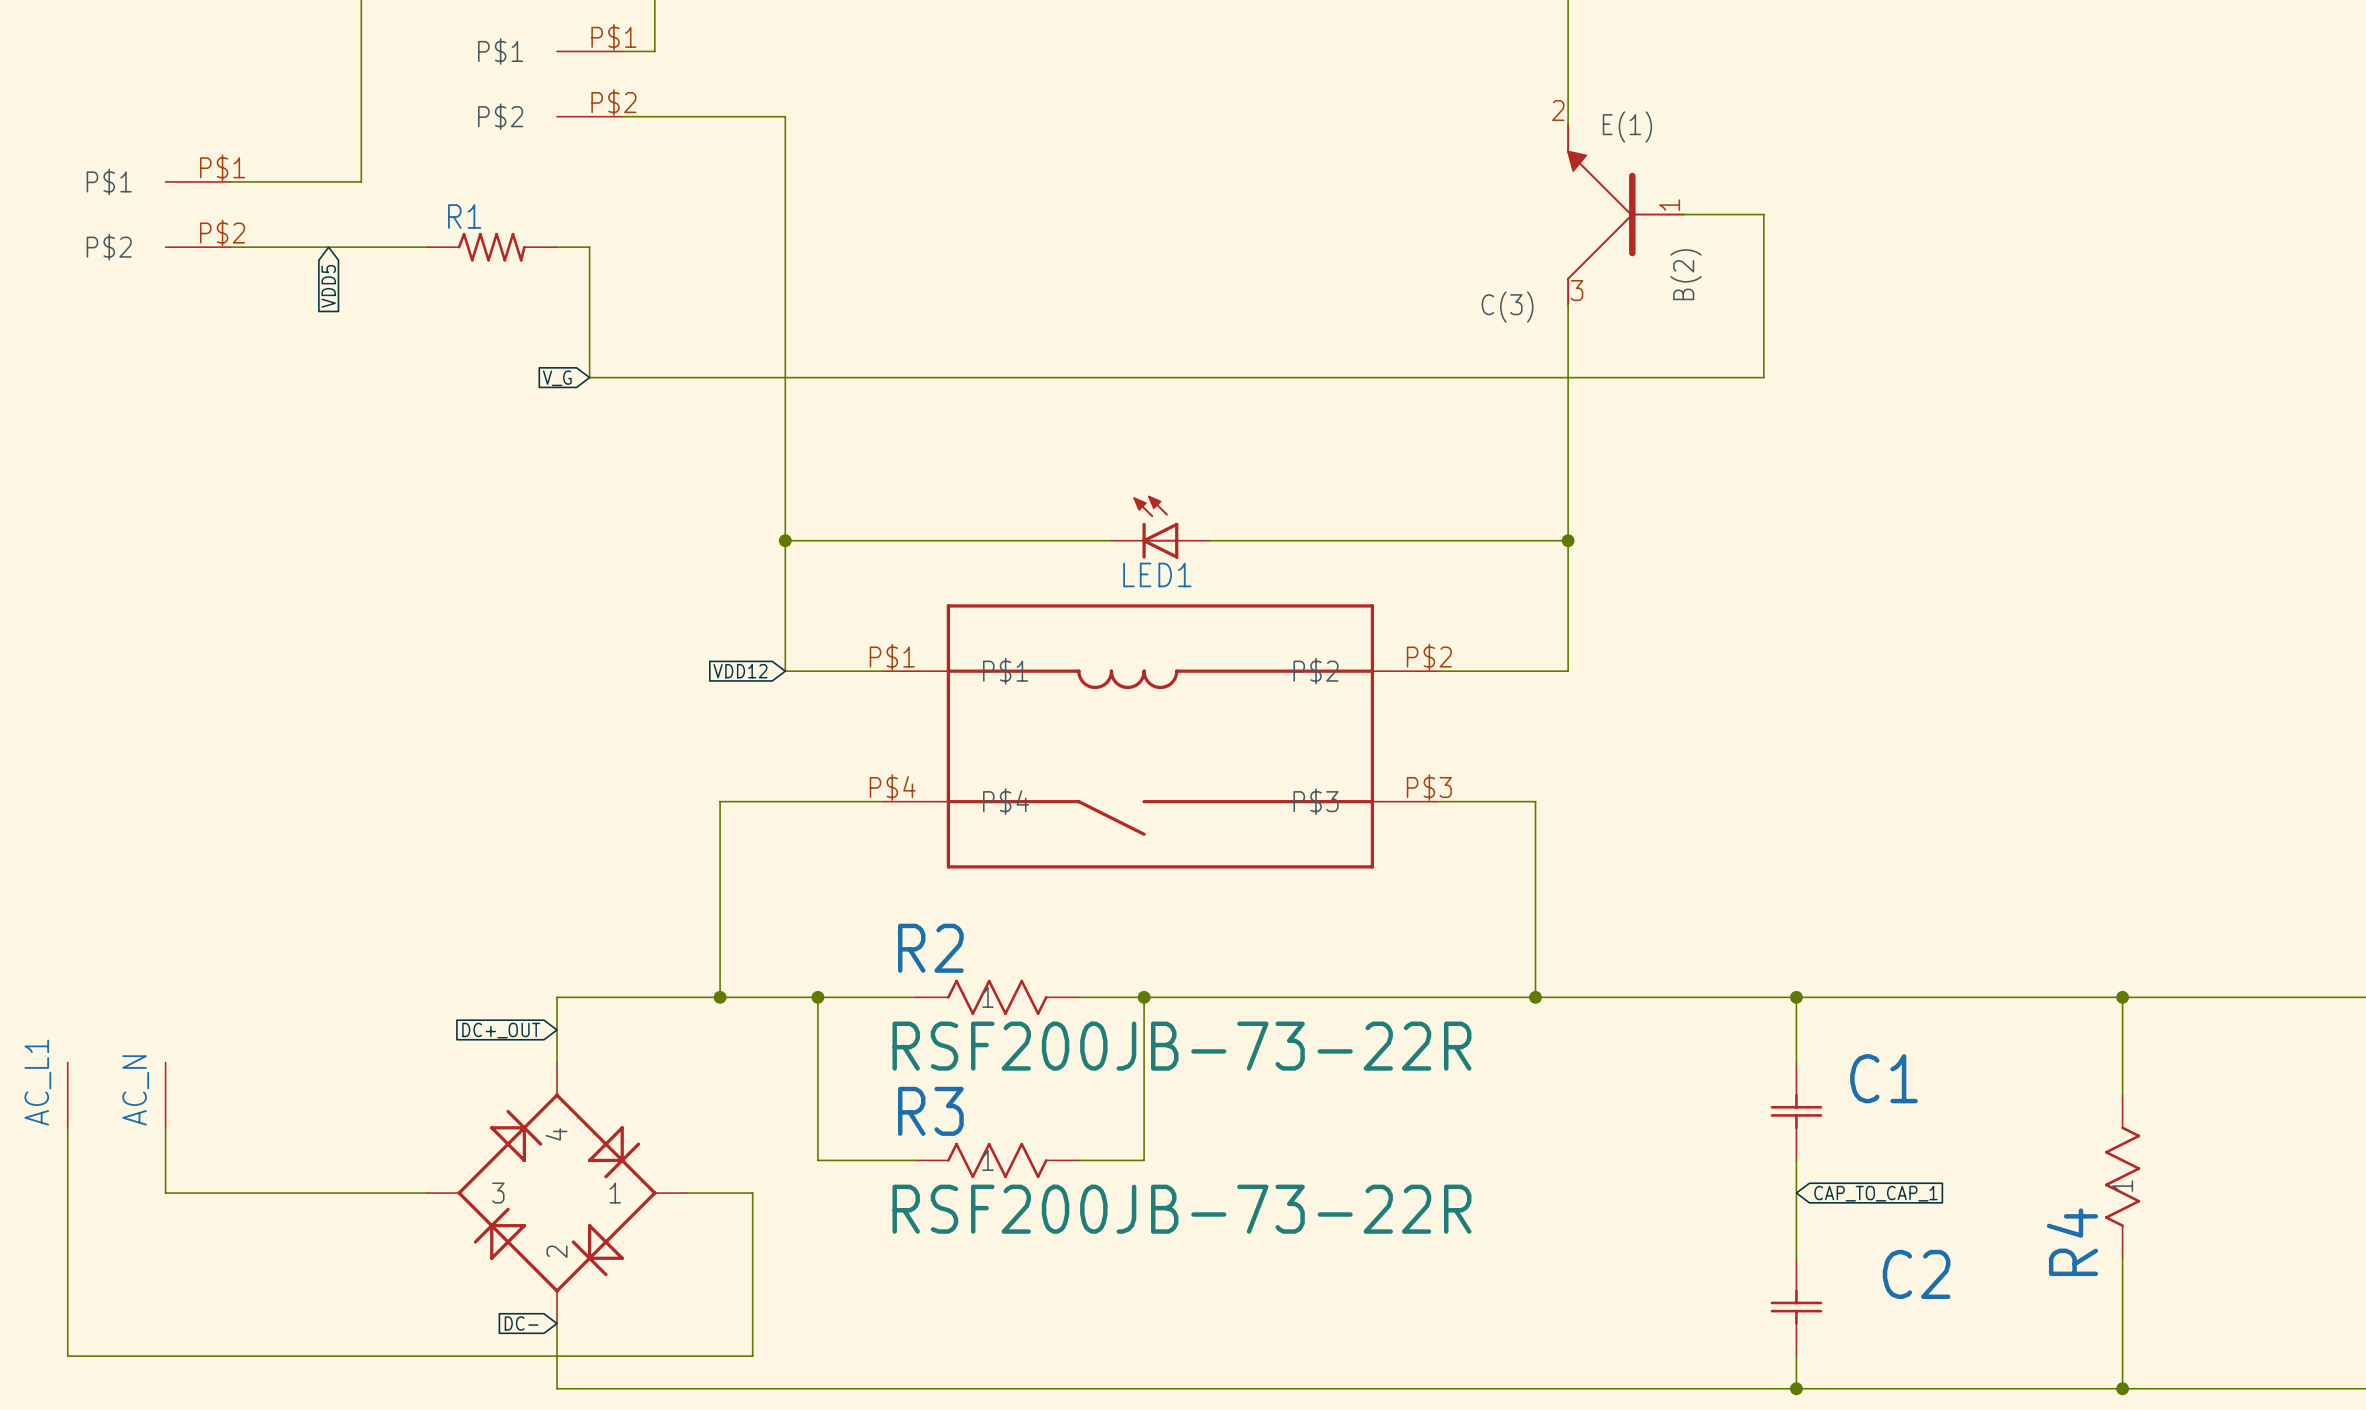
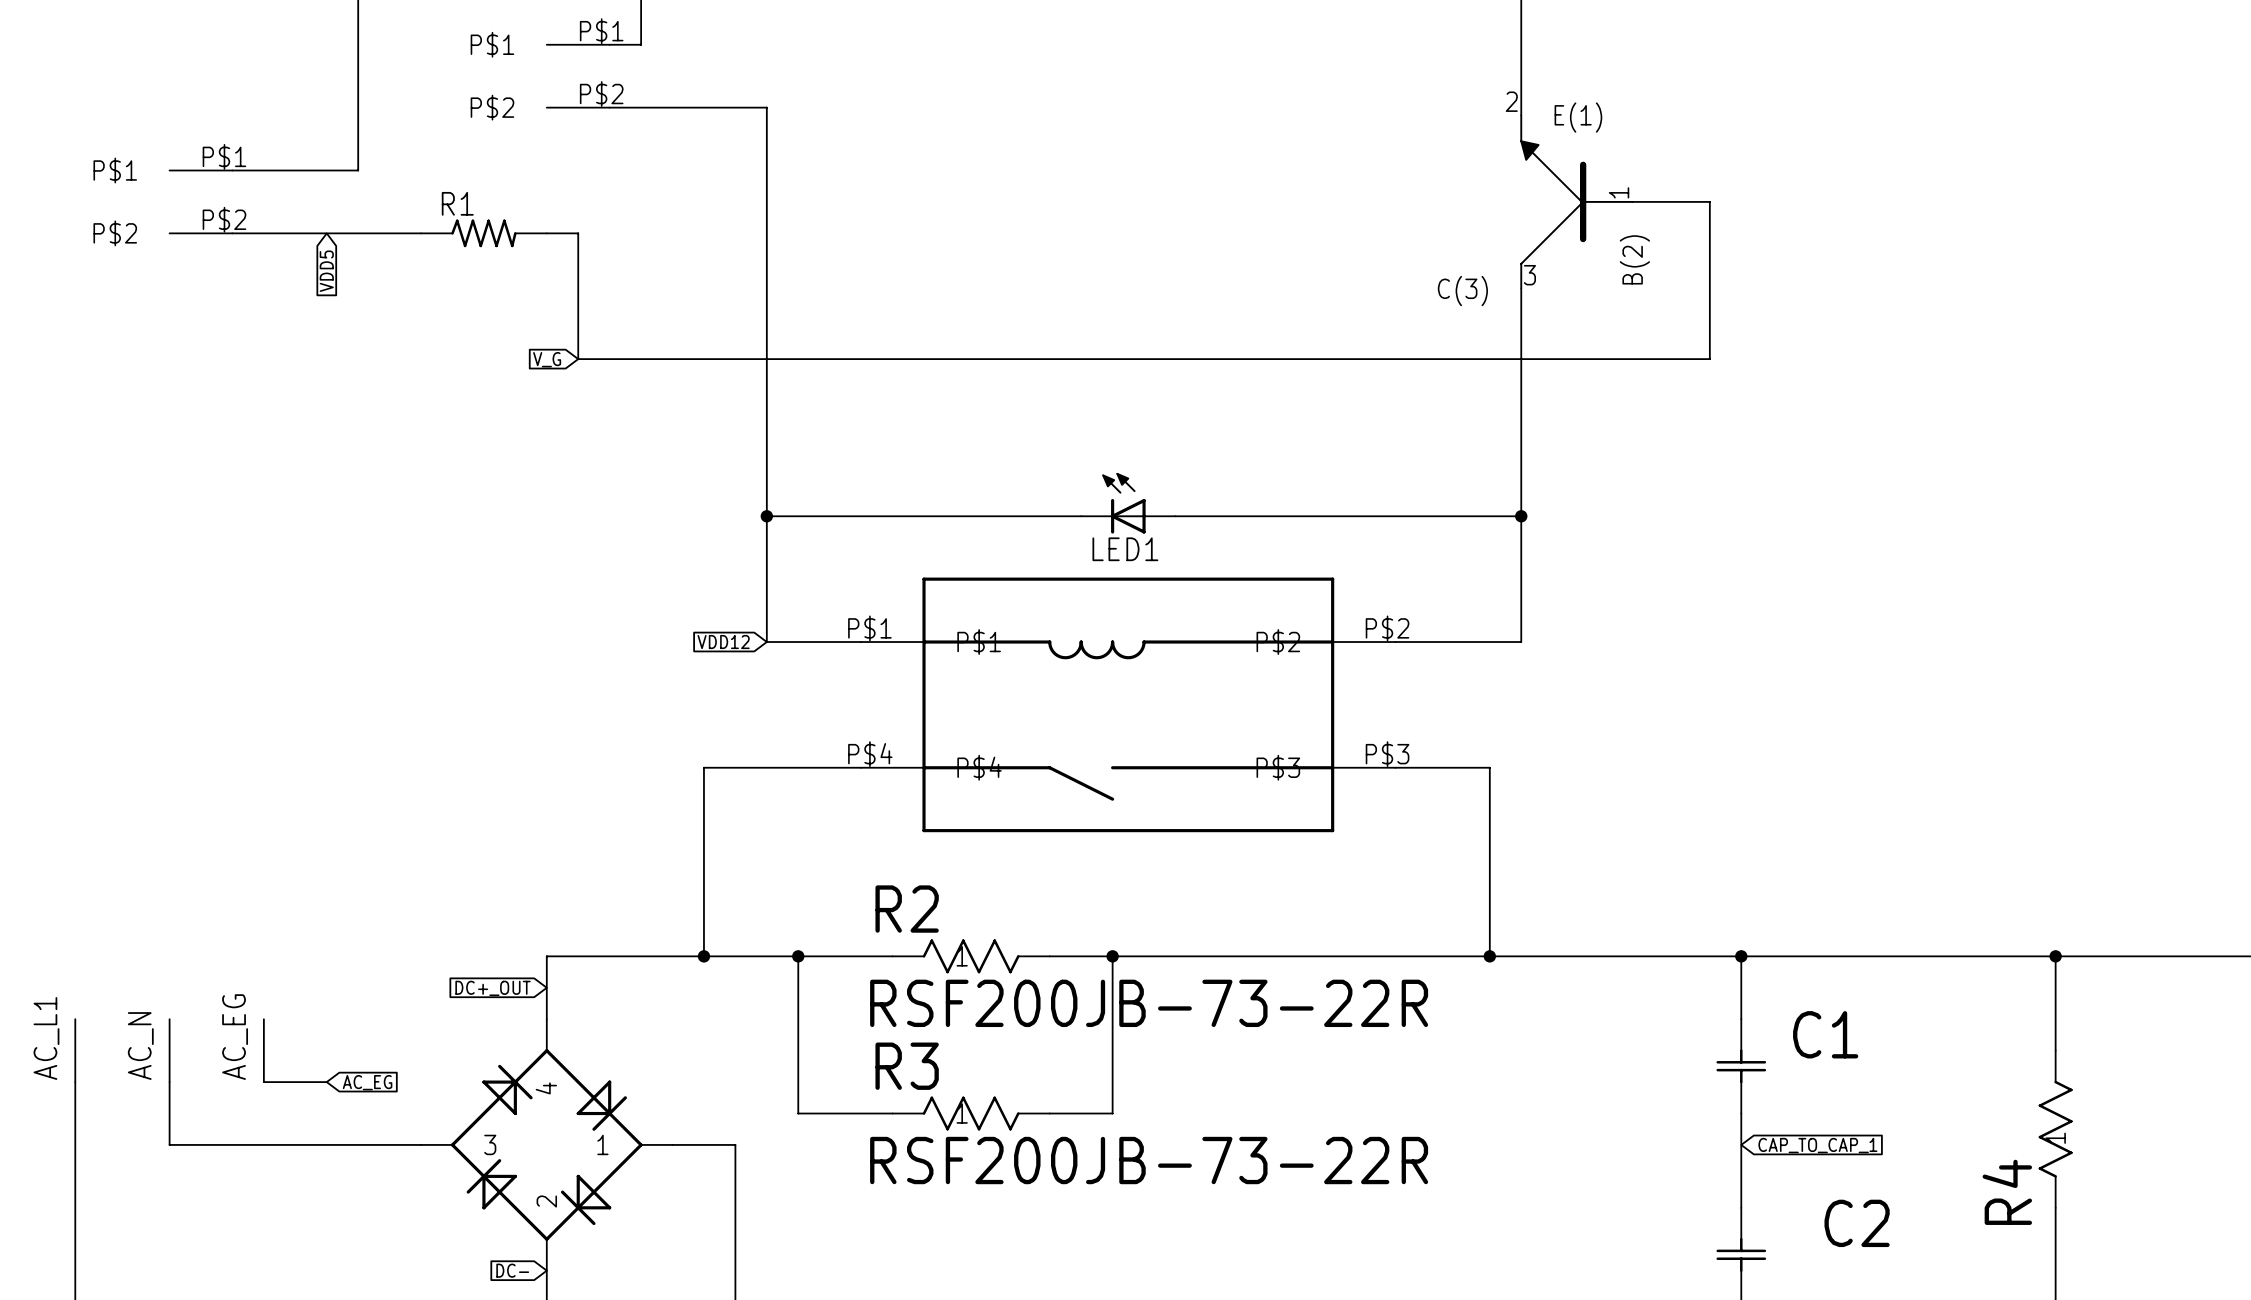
AC_EG: none -> (263, 1050)
wire: none -> (263, 1082) (326, 1082)
global label: none -> AC_EG (367, 1082)

